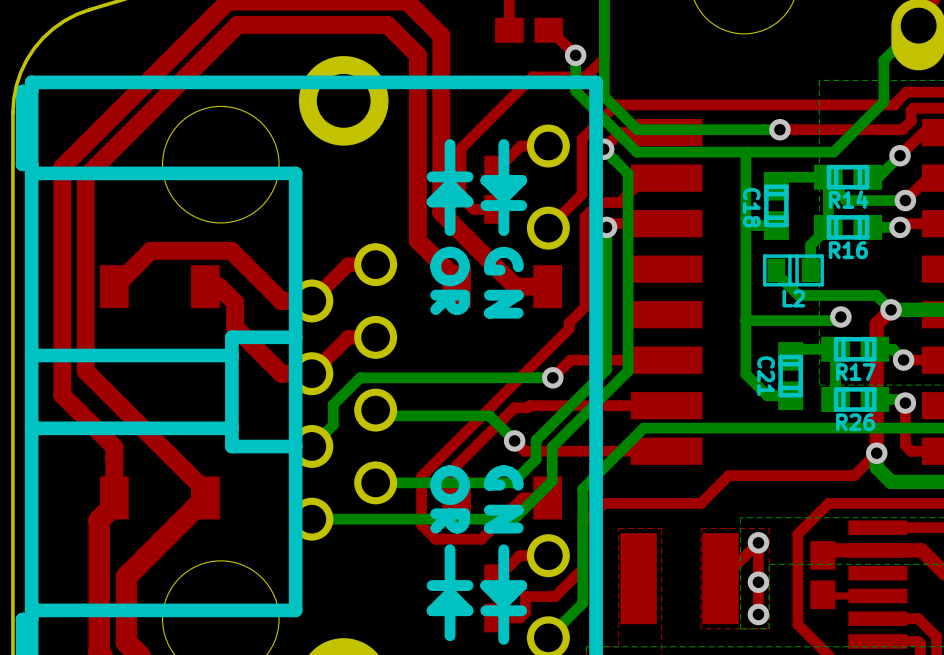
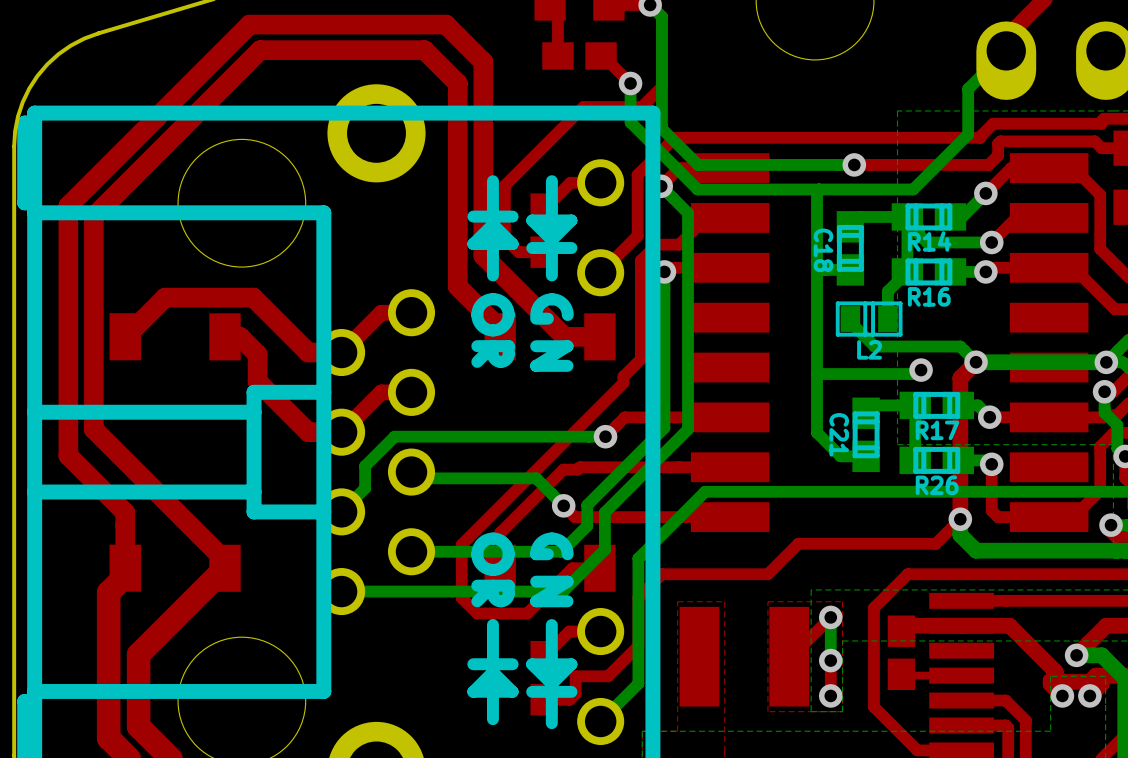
bottom track: none -> (830, 617) (830, 660)
top track: (758, 542) (758, 582) -> none

